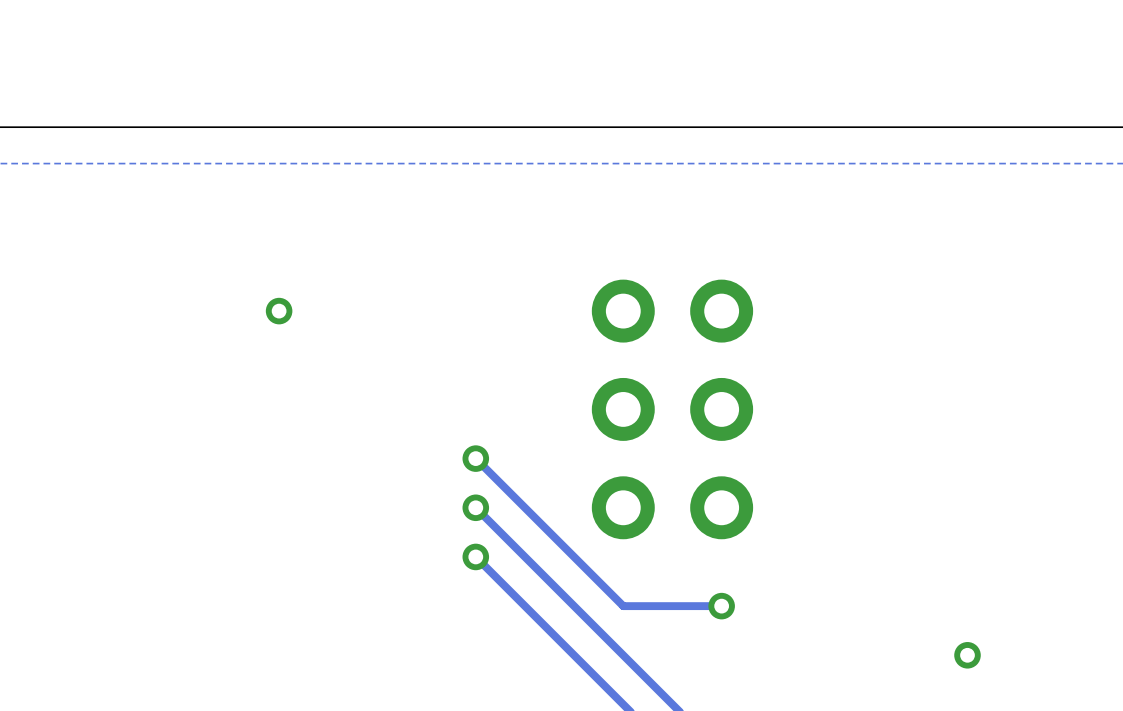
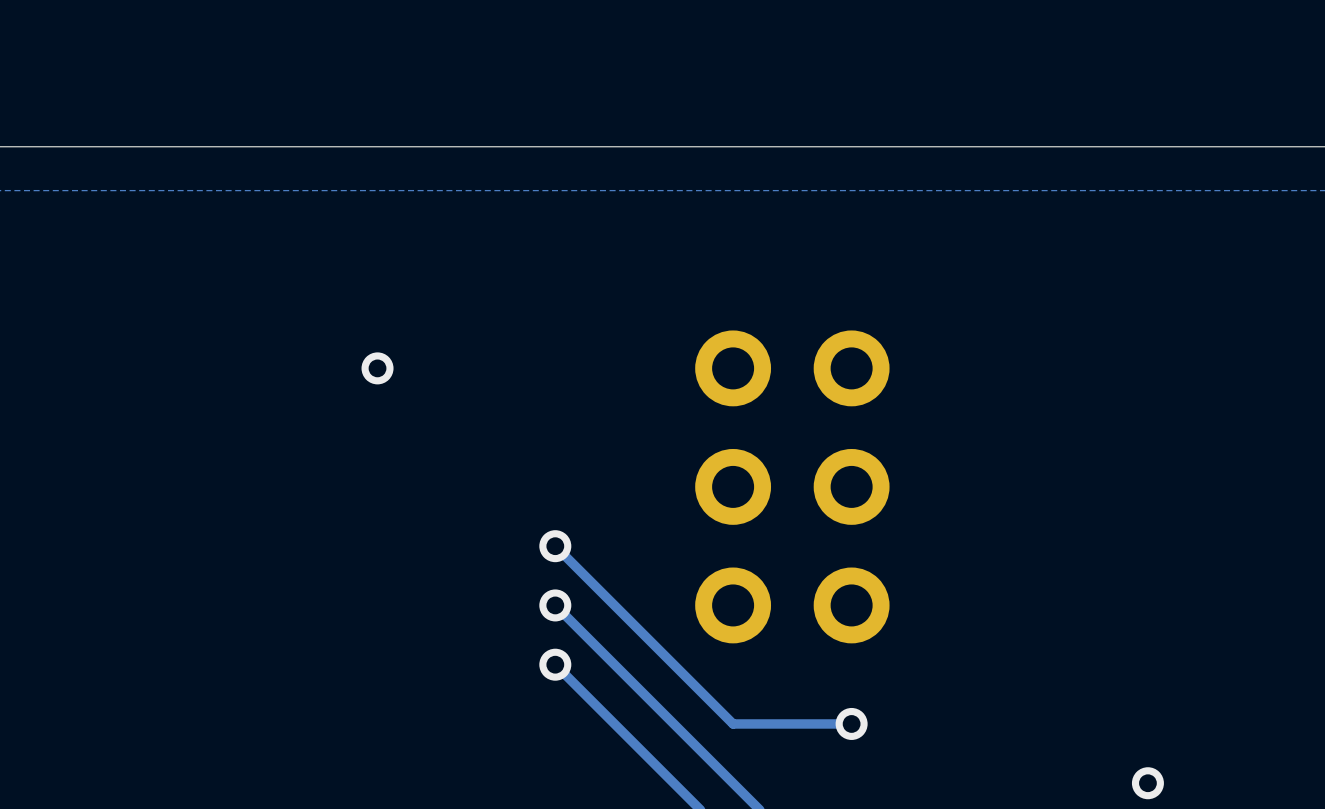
via position: (279, 311) -> (377, 368)

